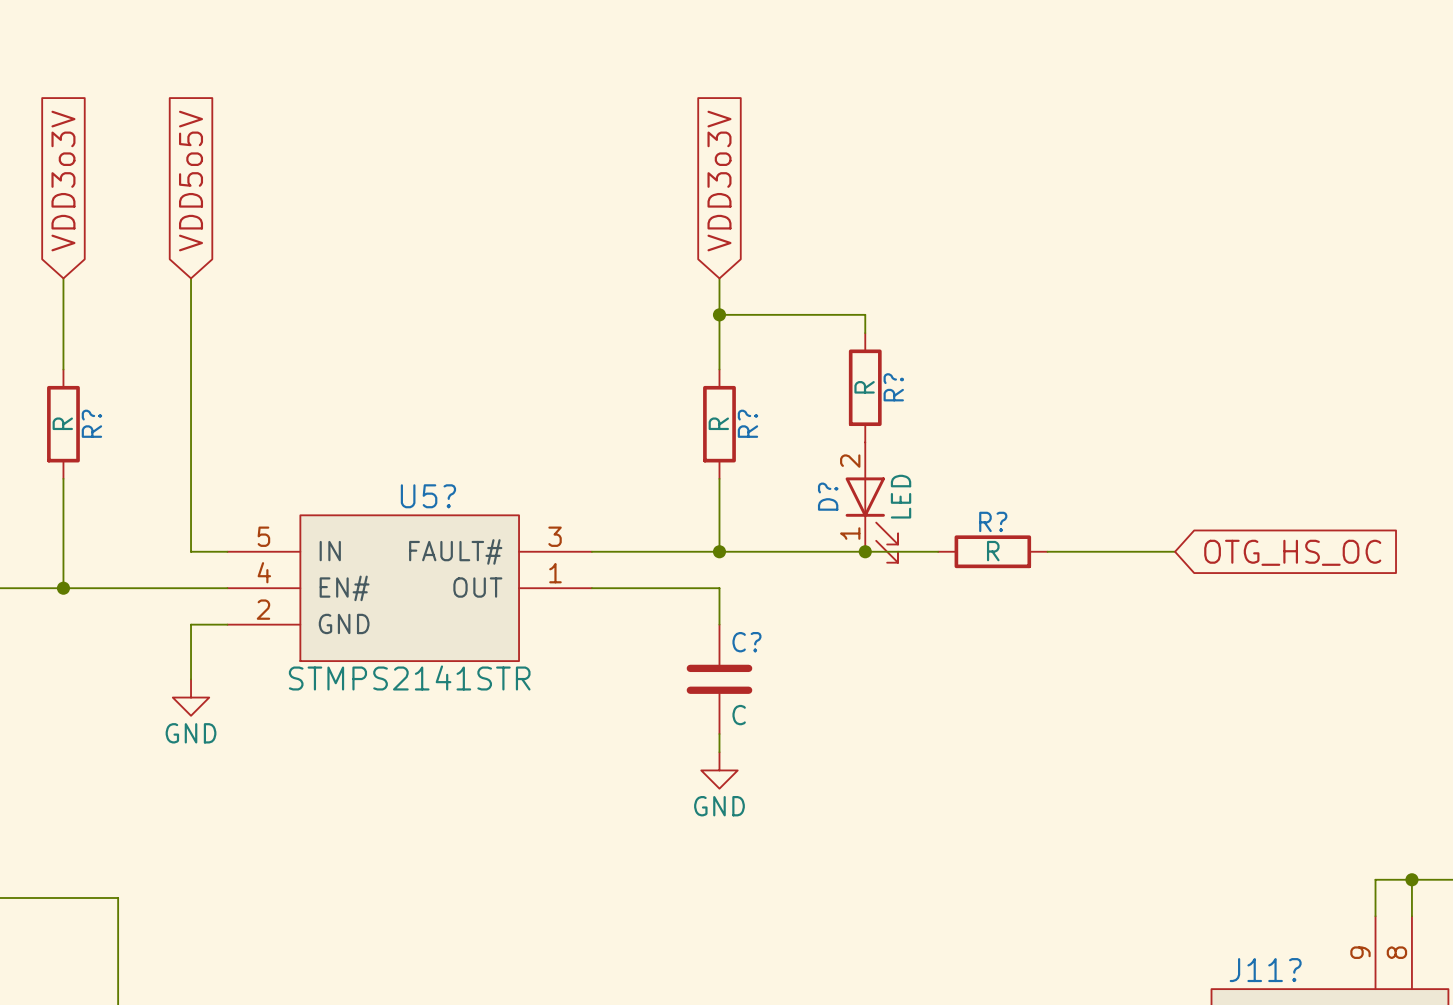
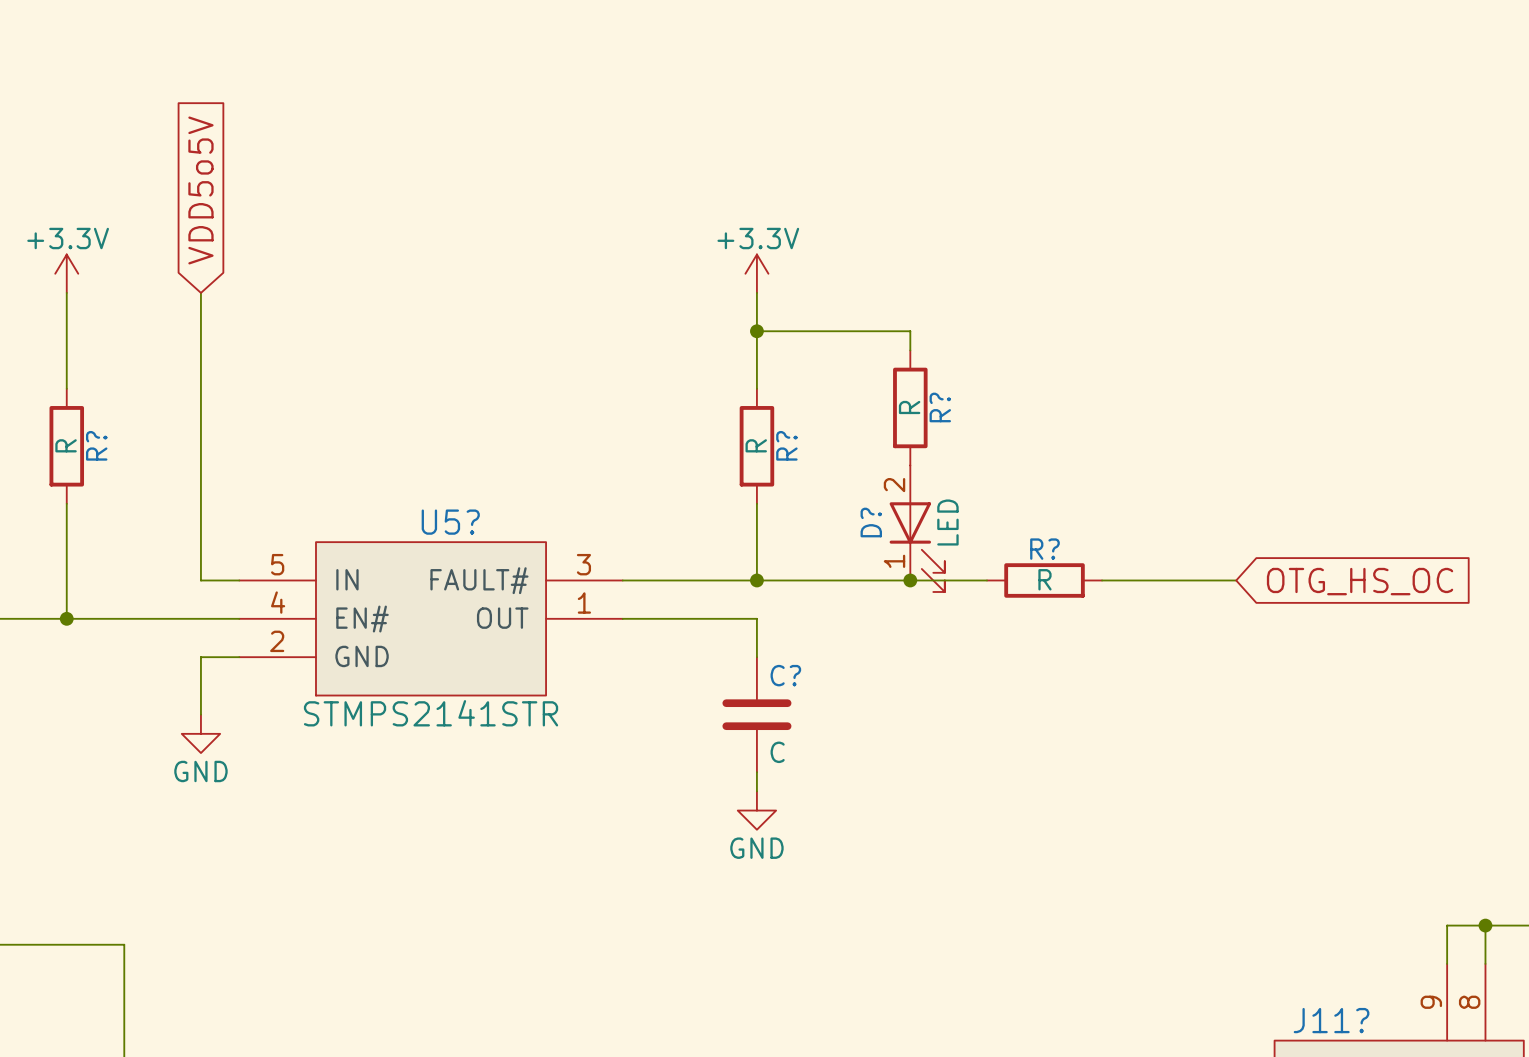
global label: VDD3o3V (63, 181) -> none
global label: VDD3o3V (719, 181) -> none
power symbol: none -> +3.3V (66, 273)
power symbol: none -> +3.3V (756, 273)

